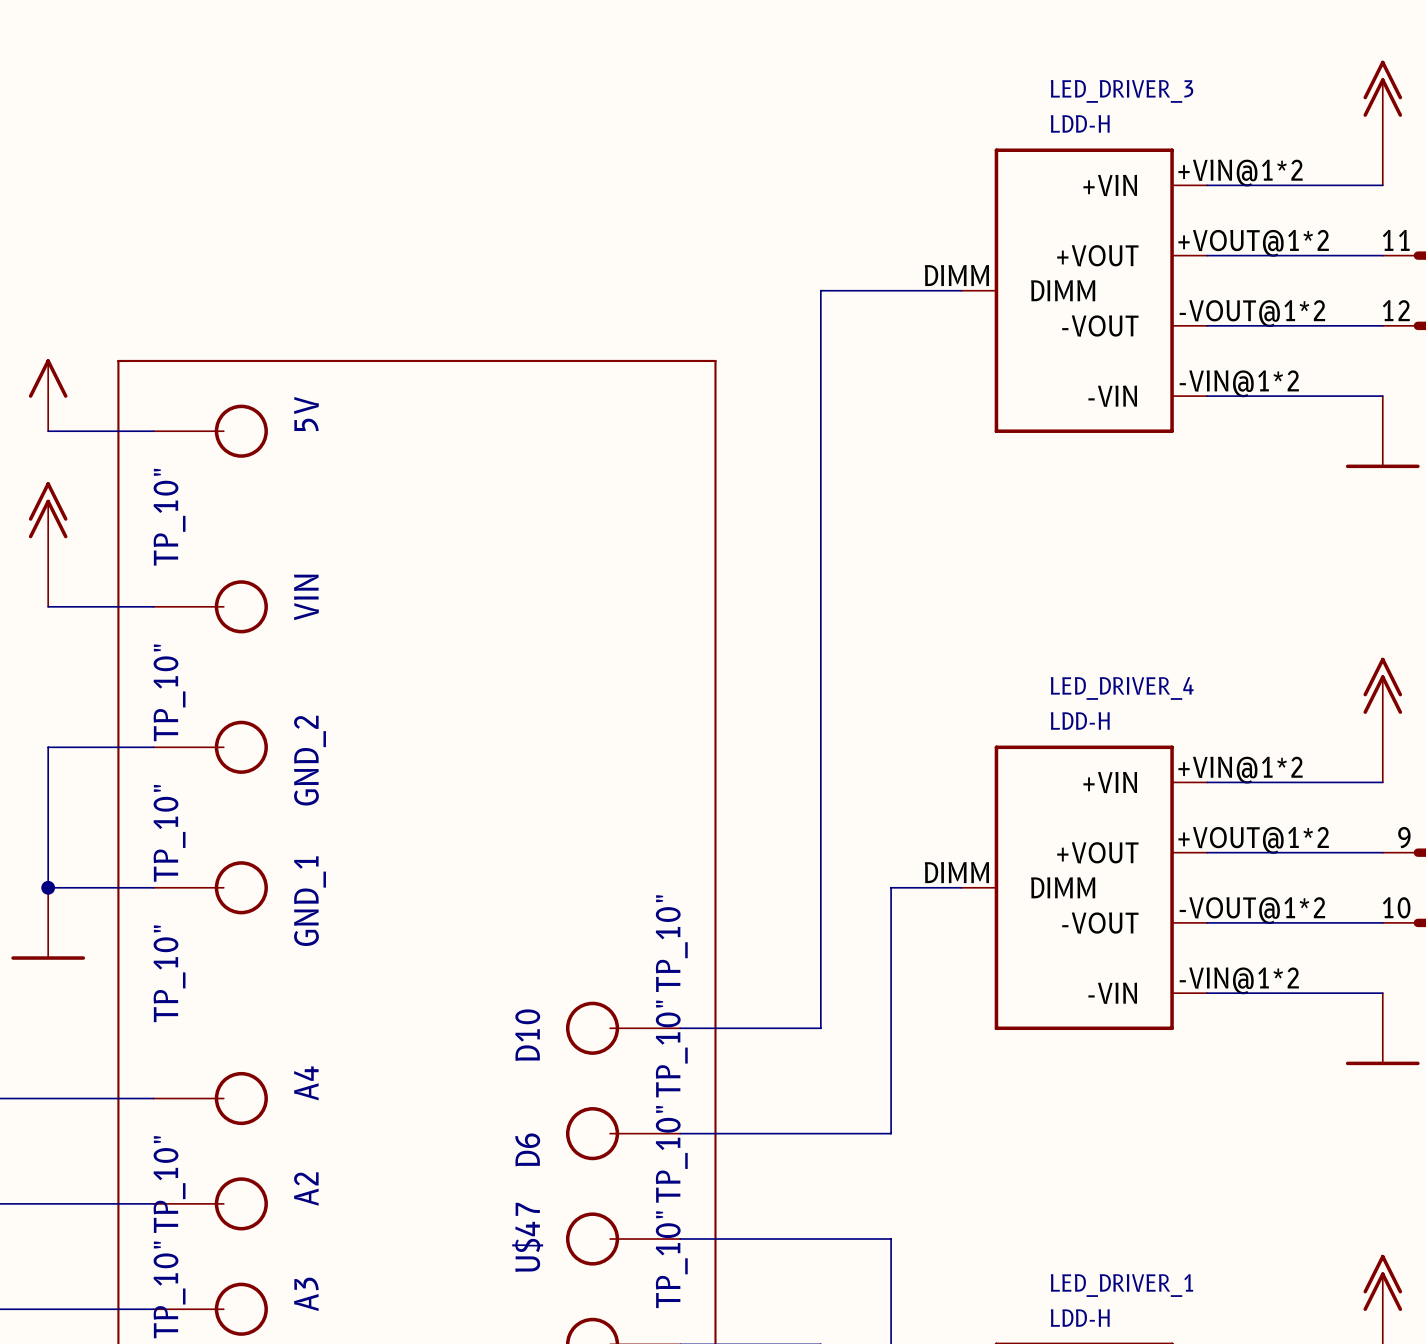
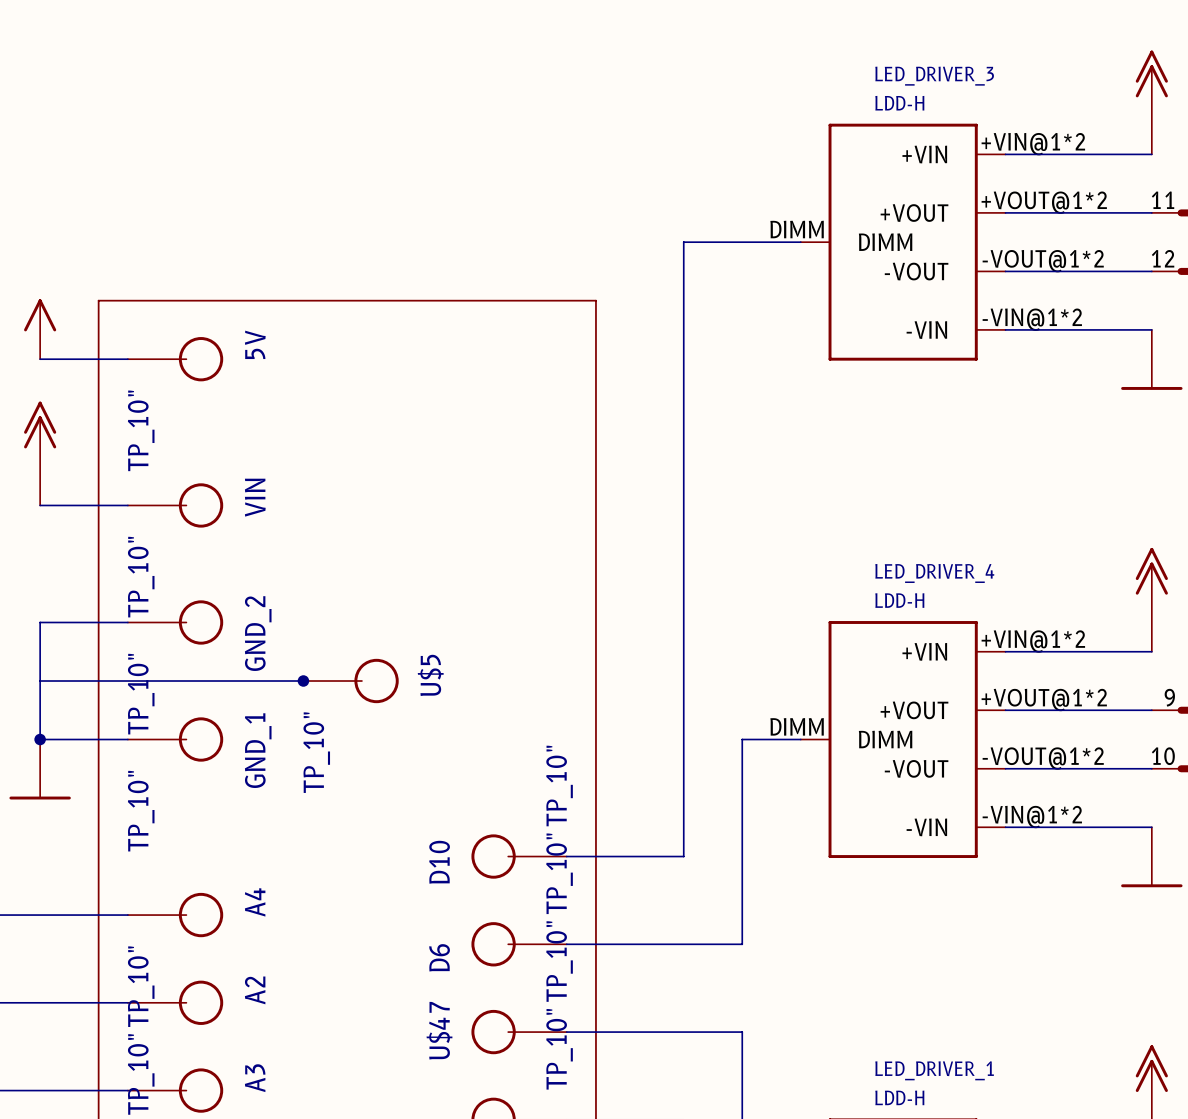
wire: none -> (40, 681) (303, 681)
junction: none -> (303, 681)
U$5: none -> TP_10" (351, 681)

